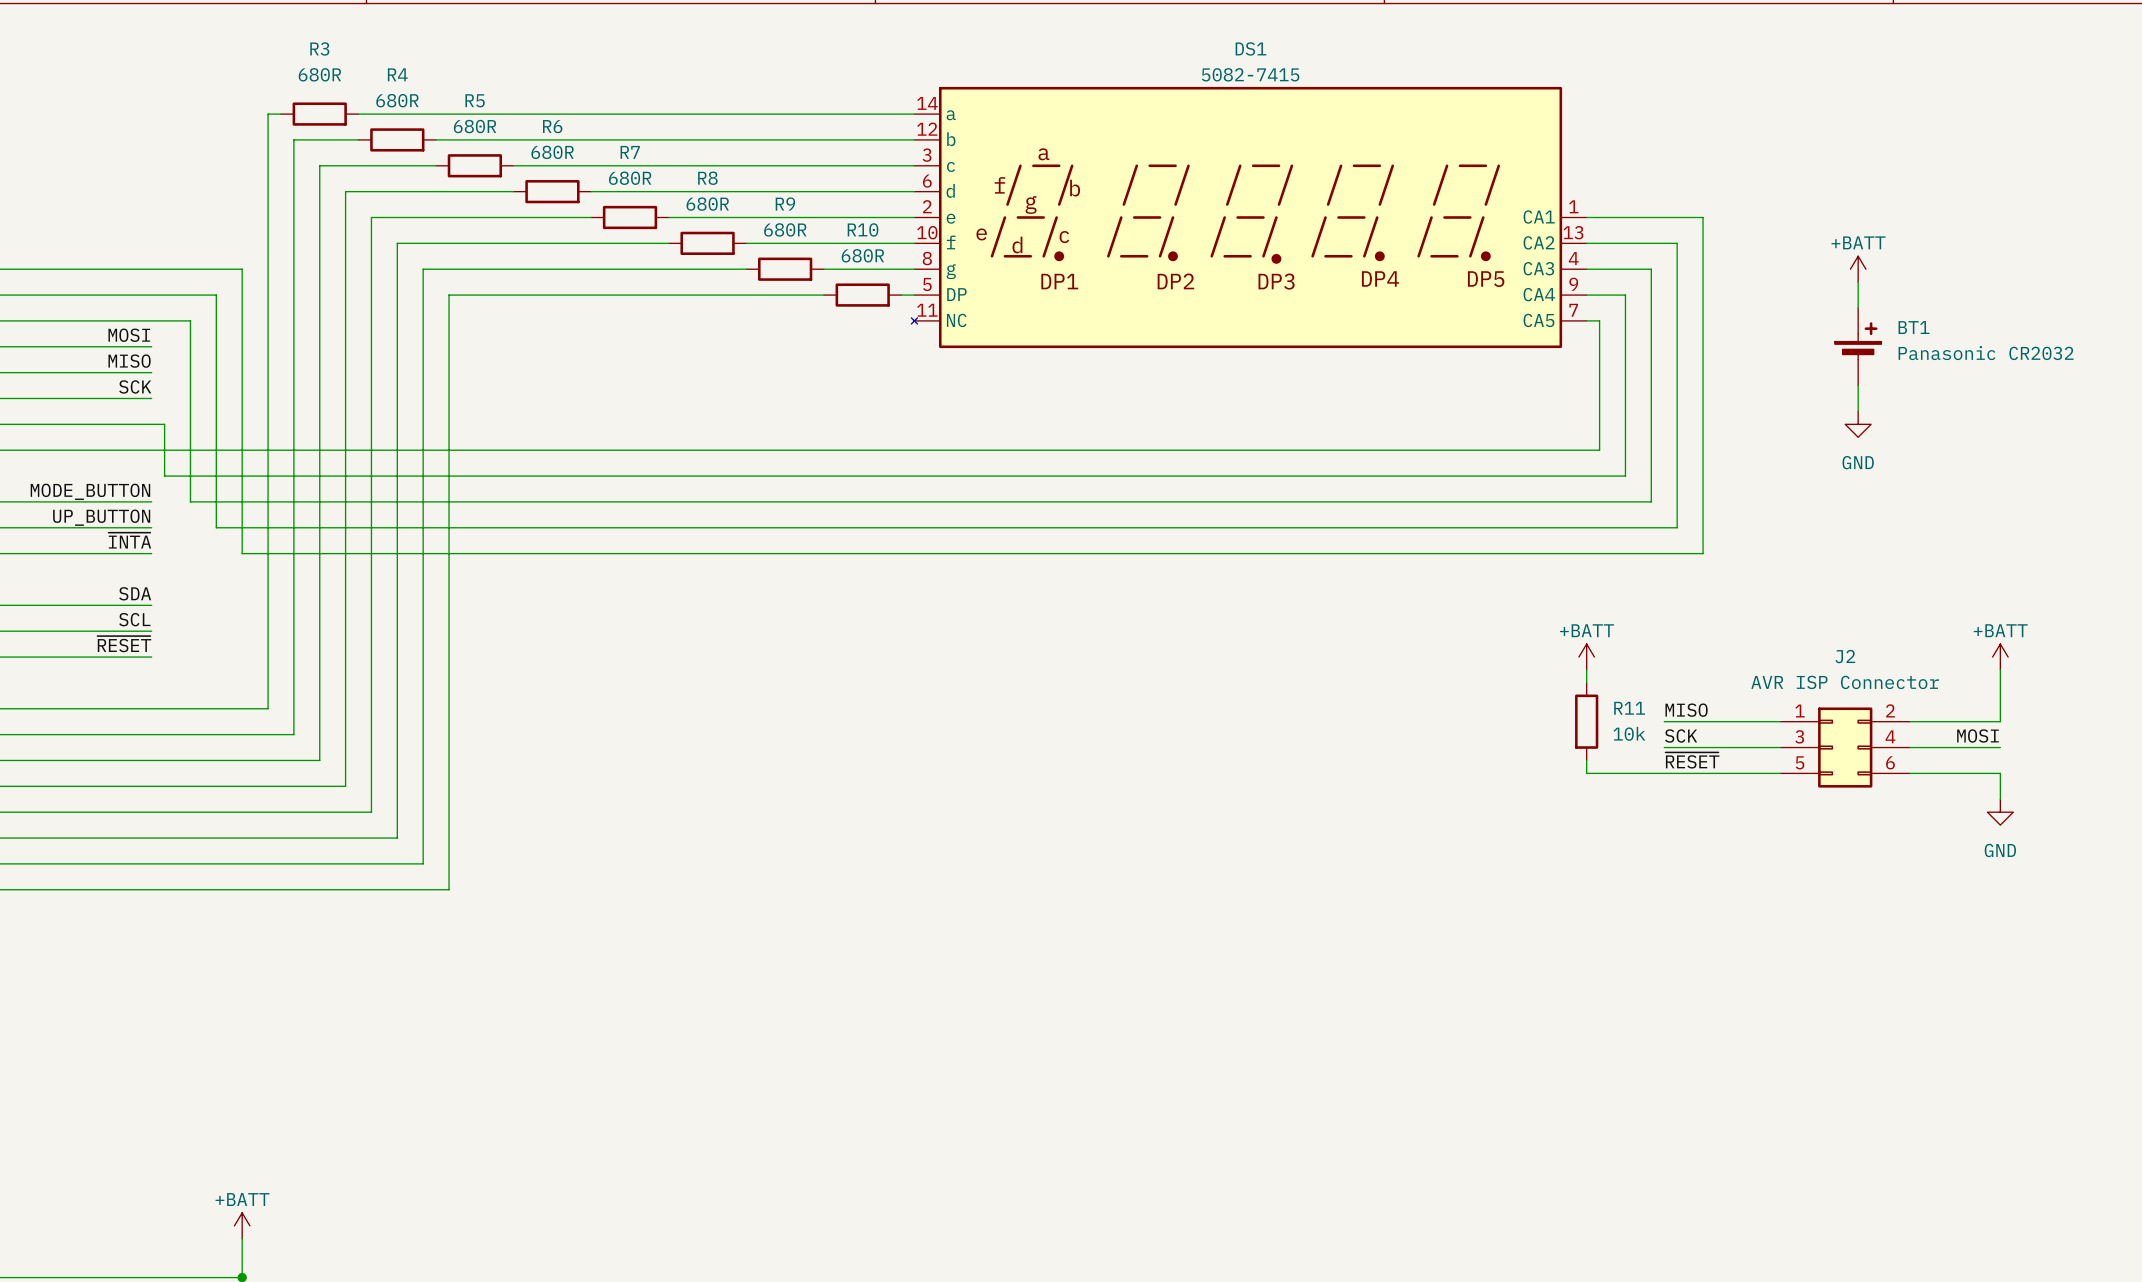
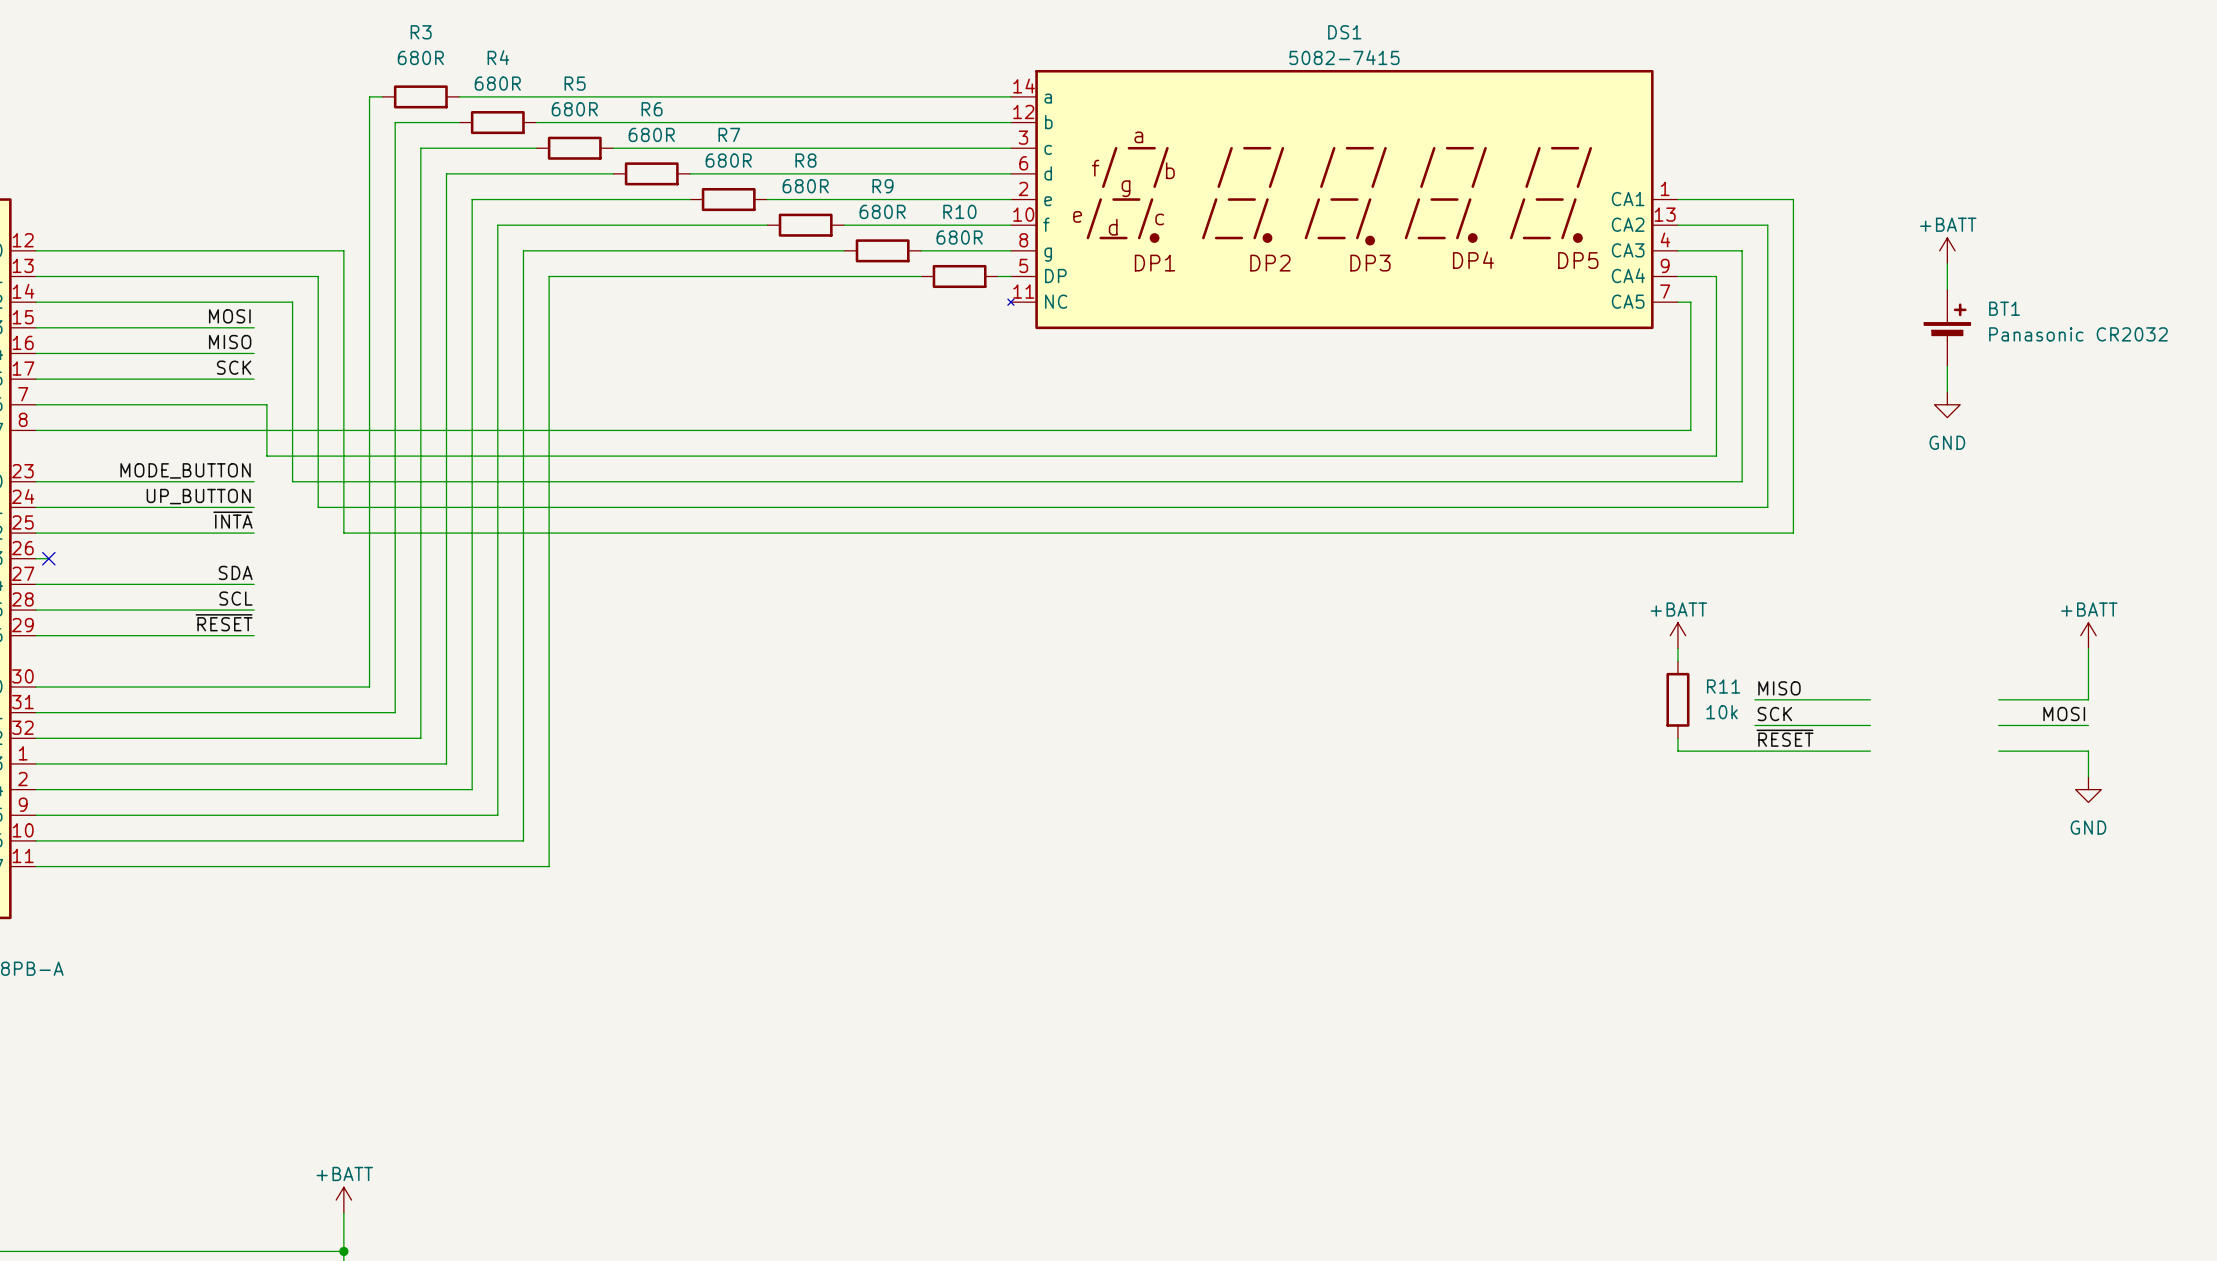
J2: AVR ISP Connector (1845, 747) -> none

